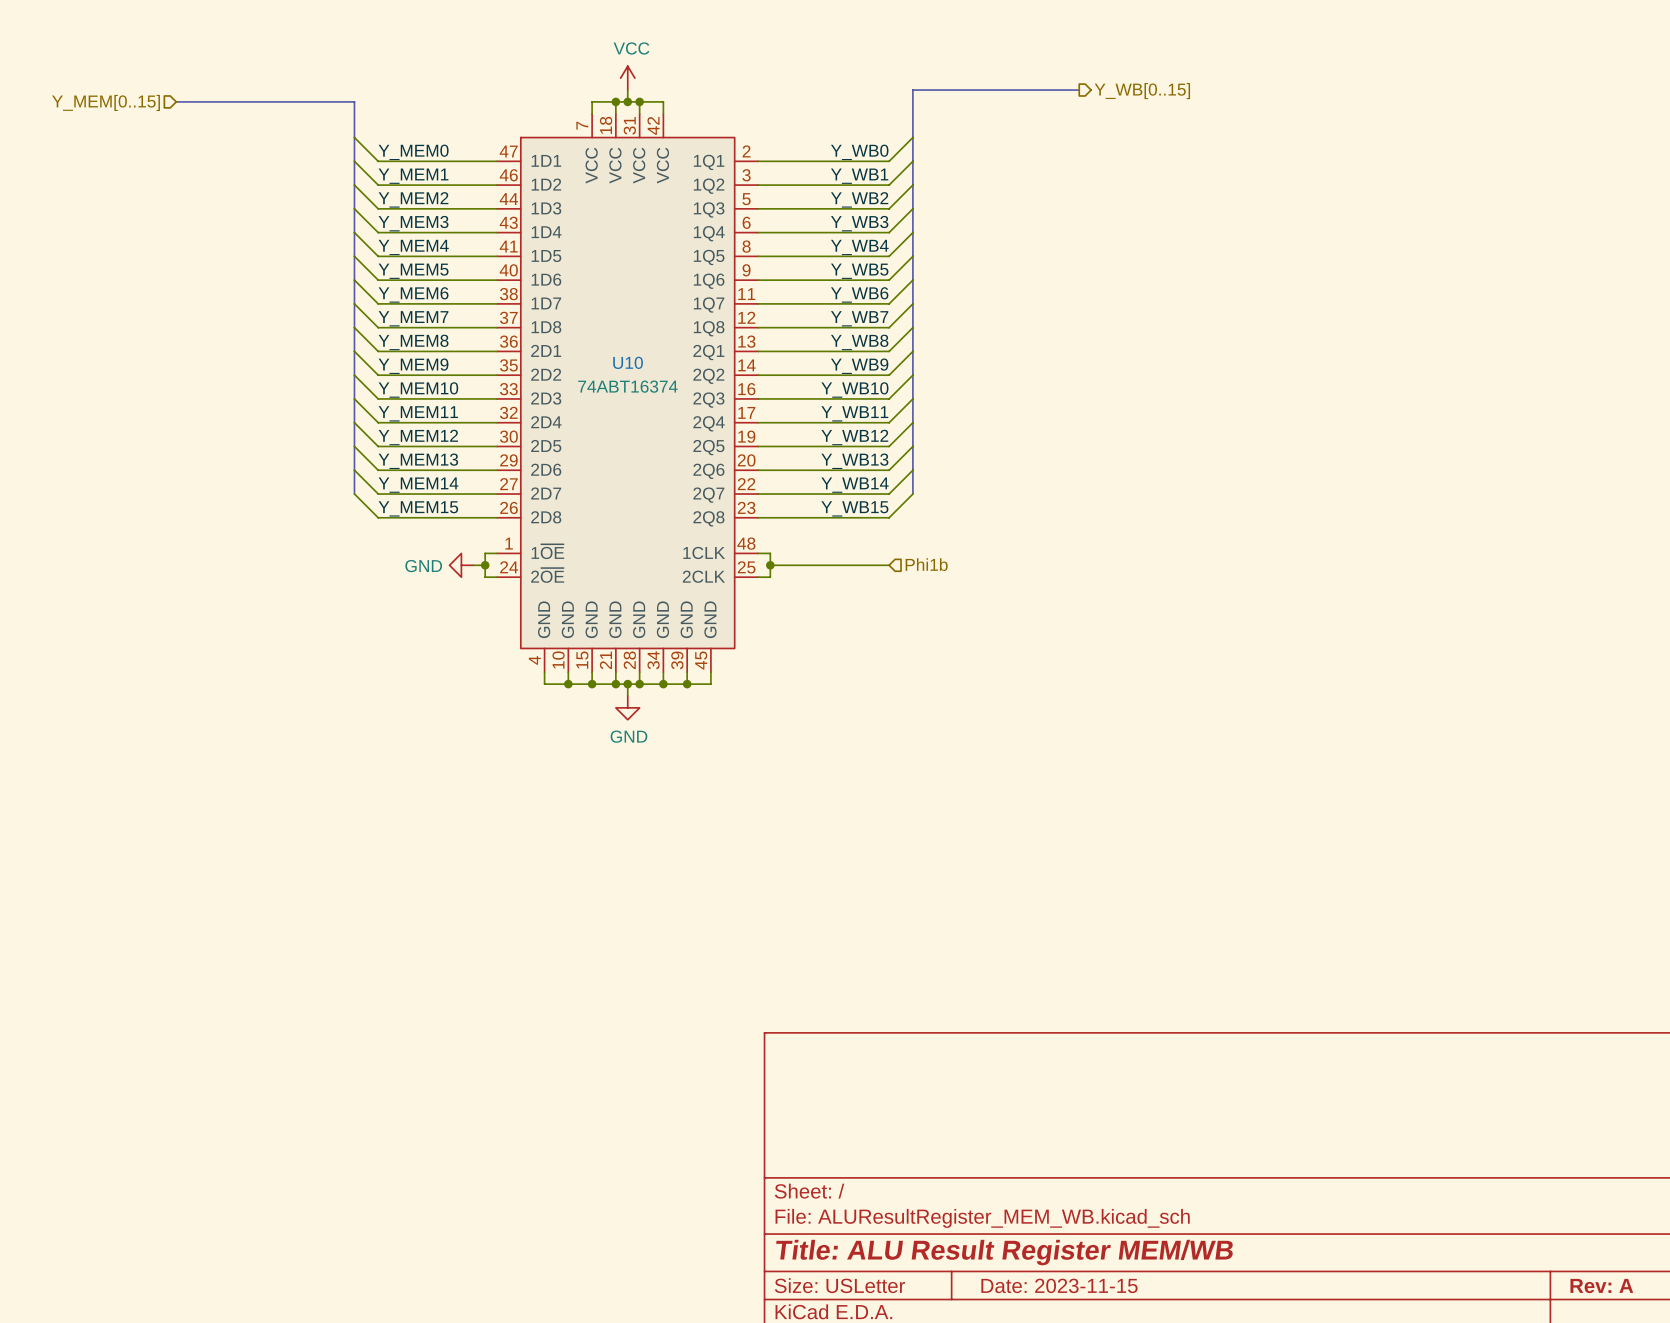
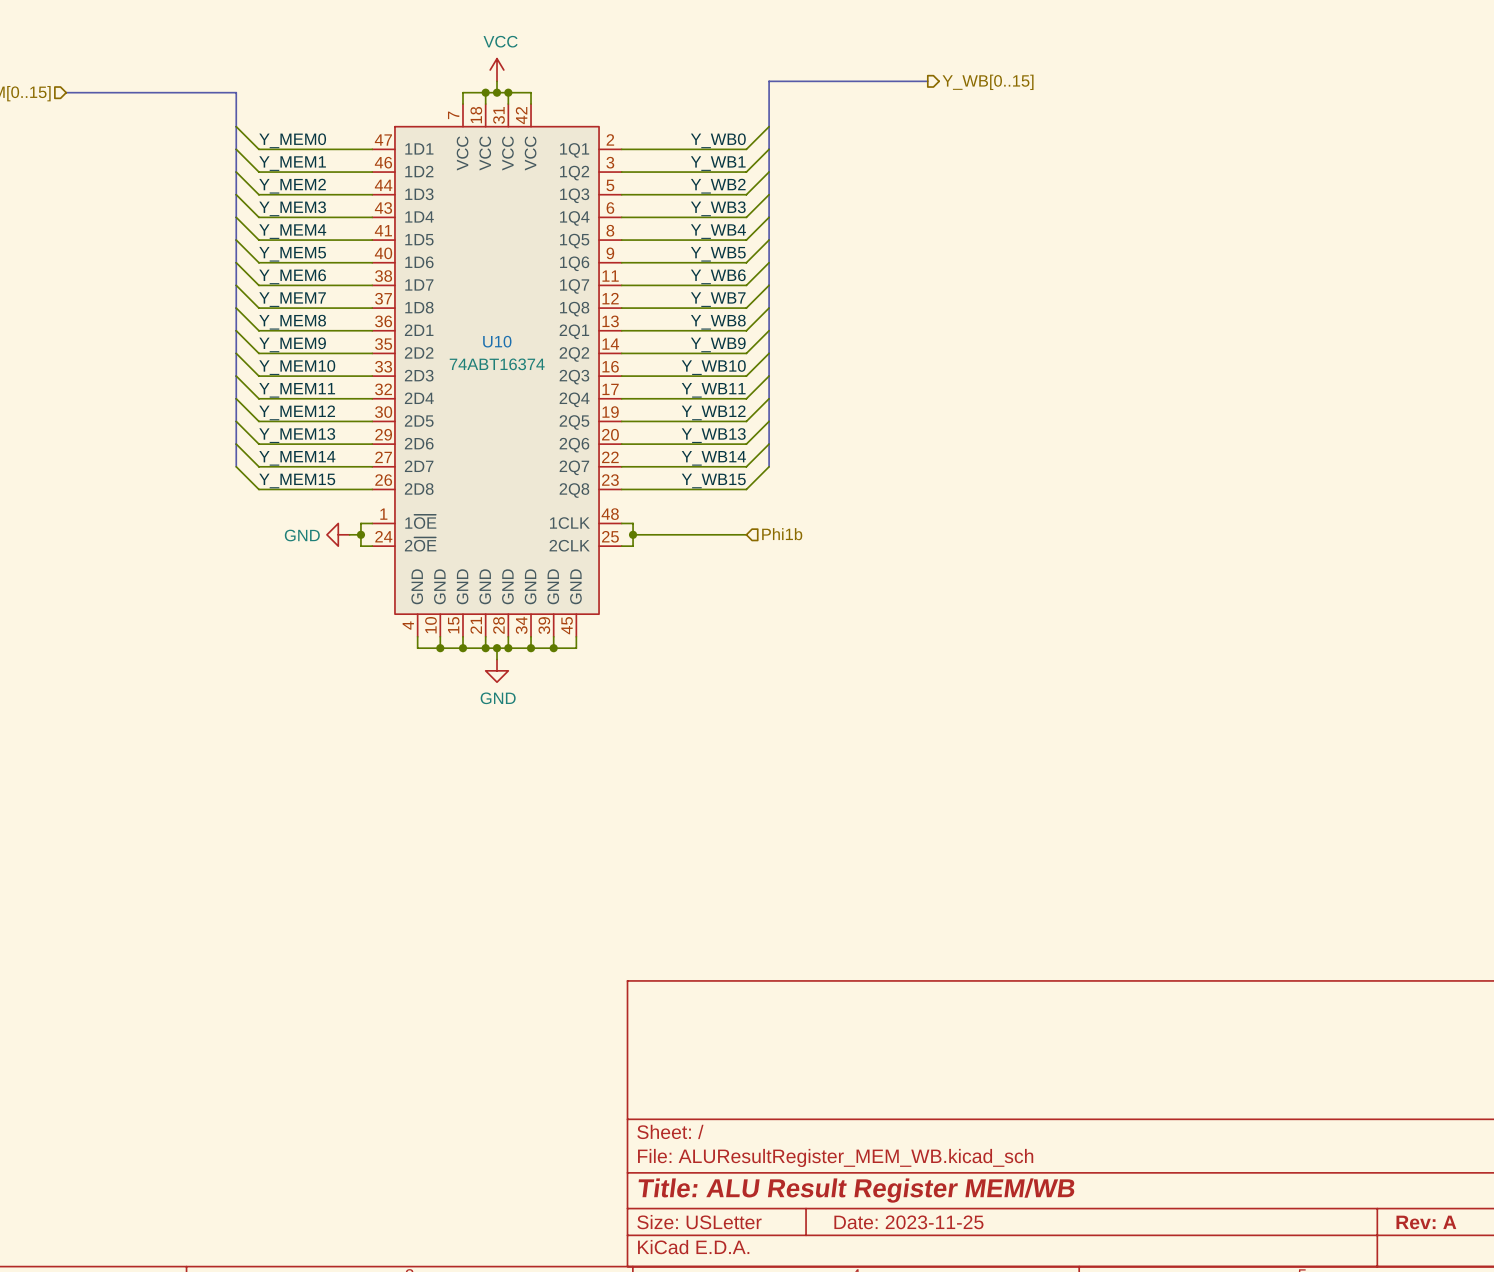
title block: Date: 2023-11-15 (1059, 1285) -> Date: 2023-11-25 (908, 1222)

